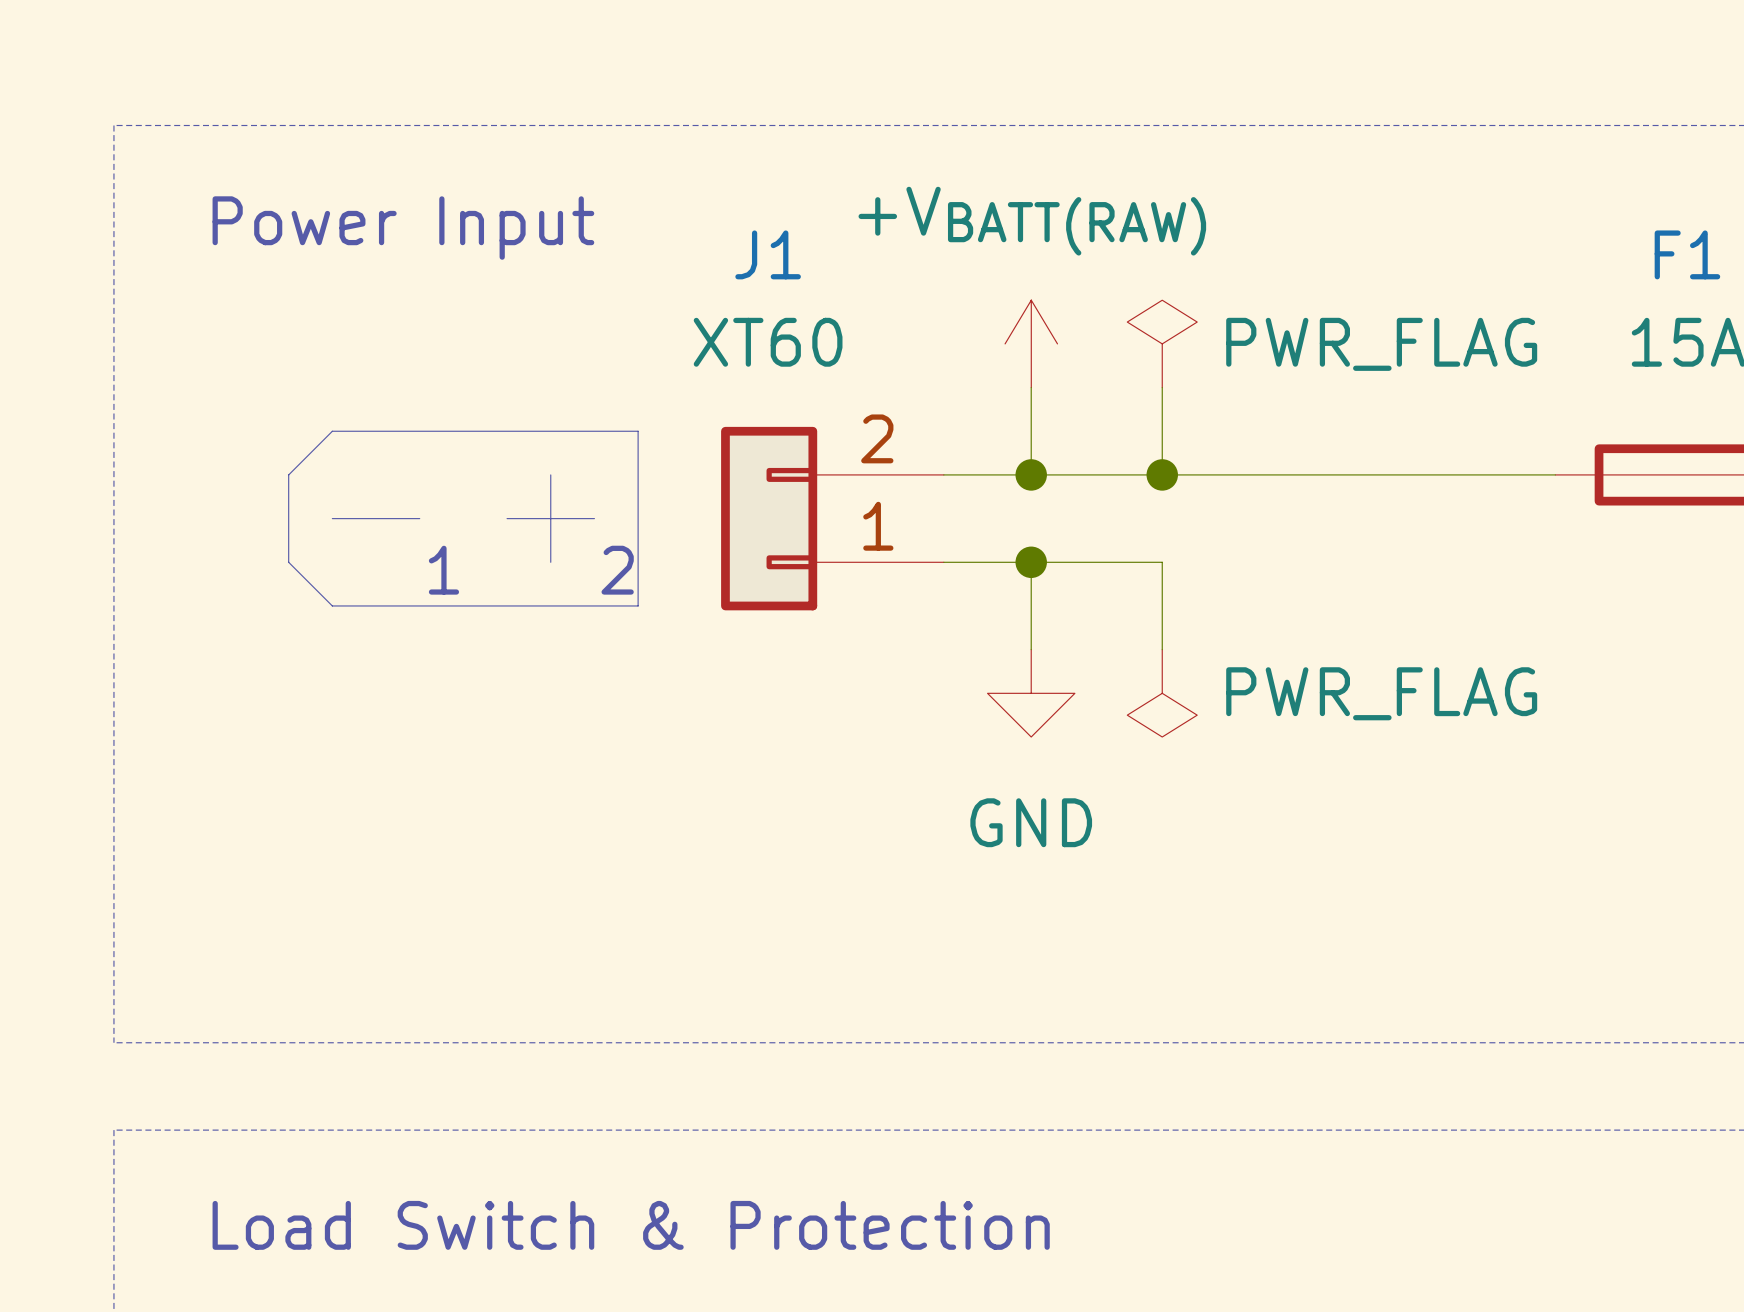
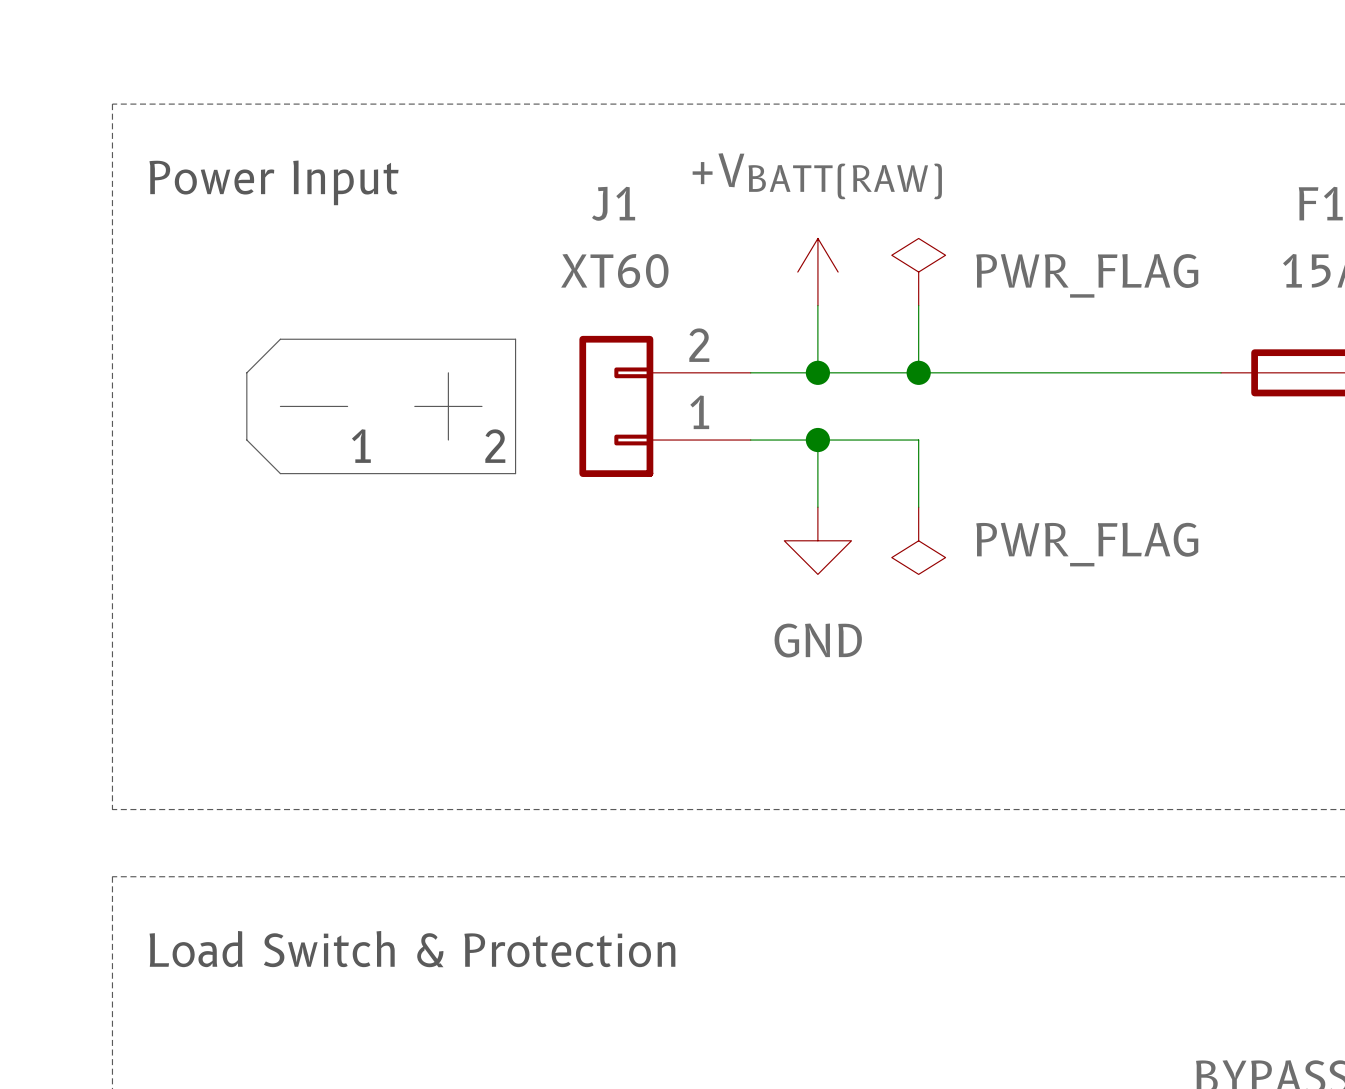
text position: Power Input (403, 228) -> Power Input (274, 182)
text position: Load Switch & Protection (631, 1225) -> Load Switch & Protection (412, 949)

